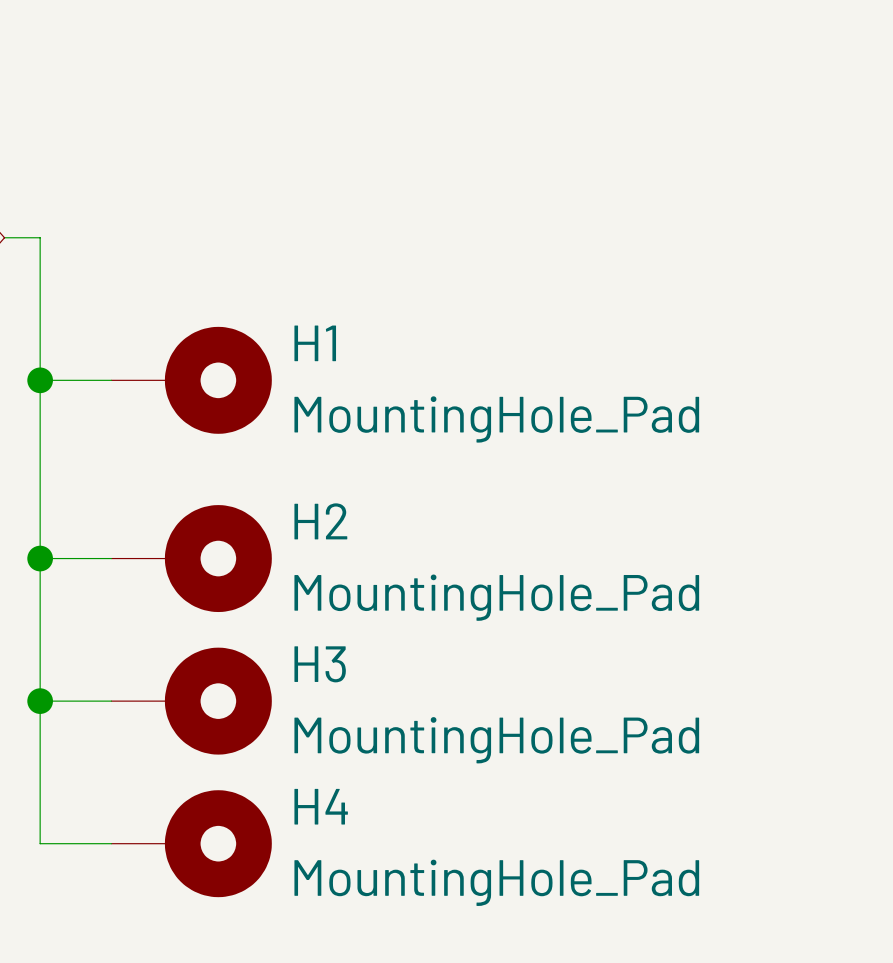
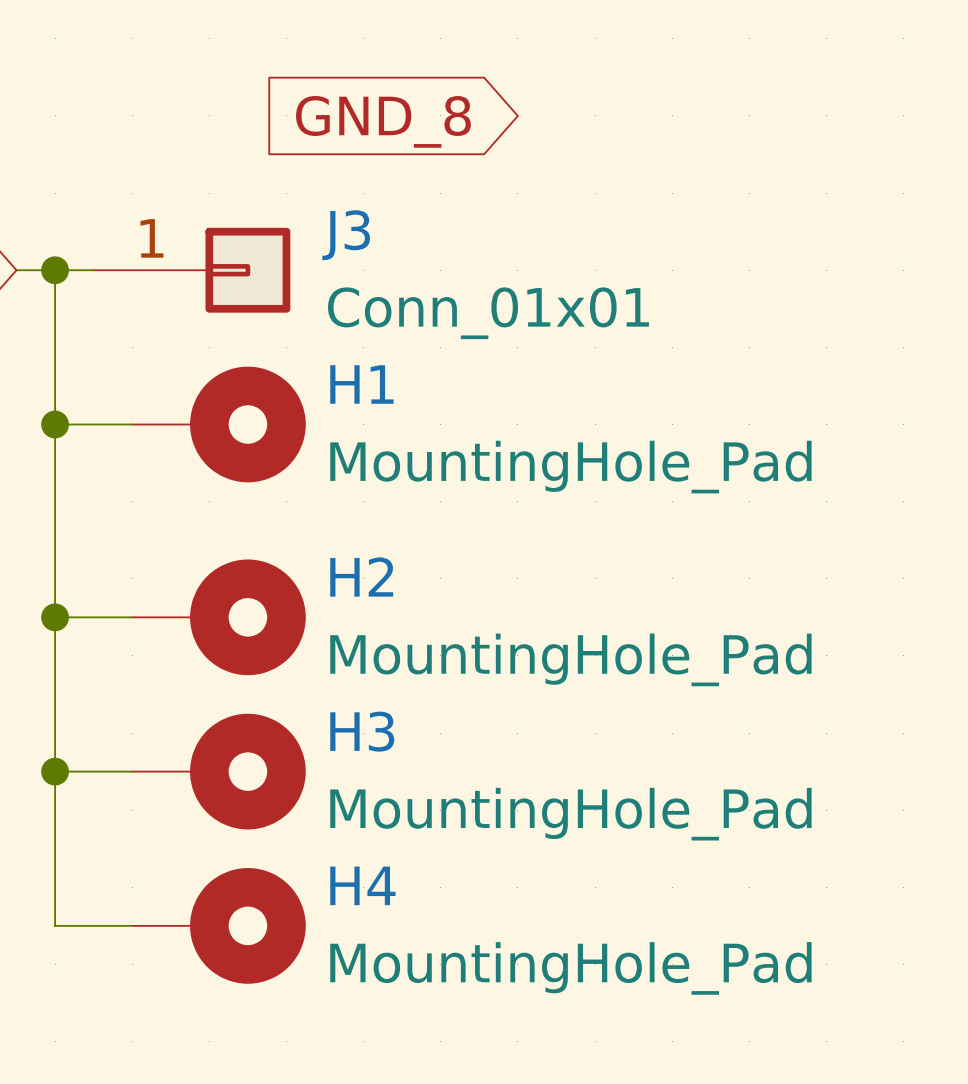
global label: none -> GND_8 (383, 121)
wire: none -> (55, 270) (93, 270)
junction: none -> (55, 270)
J3: none -> Conn_01x01 (191, 270)

